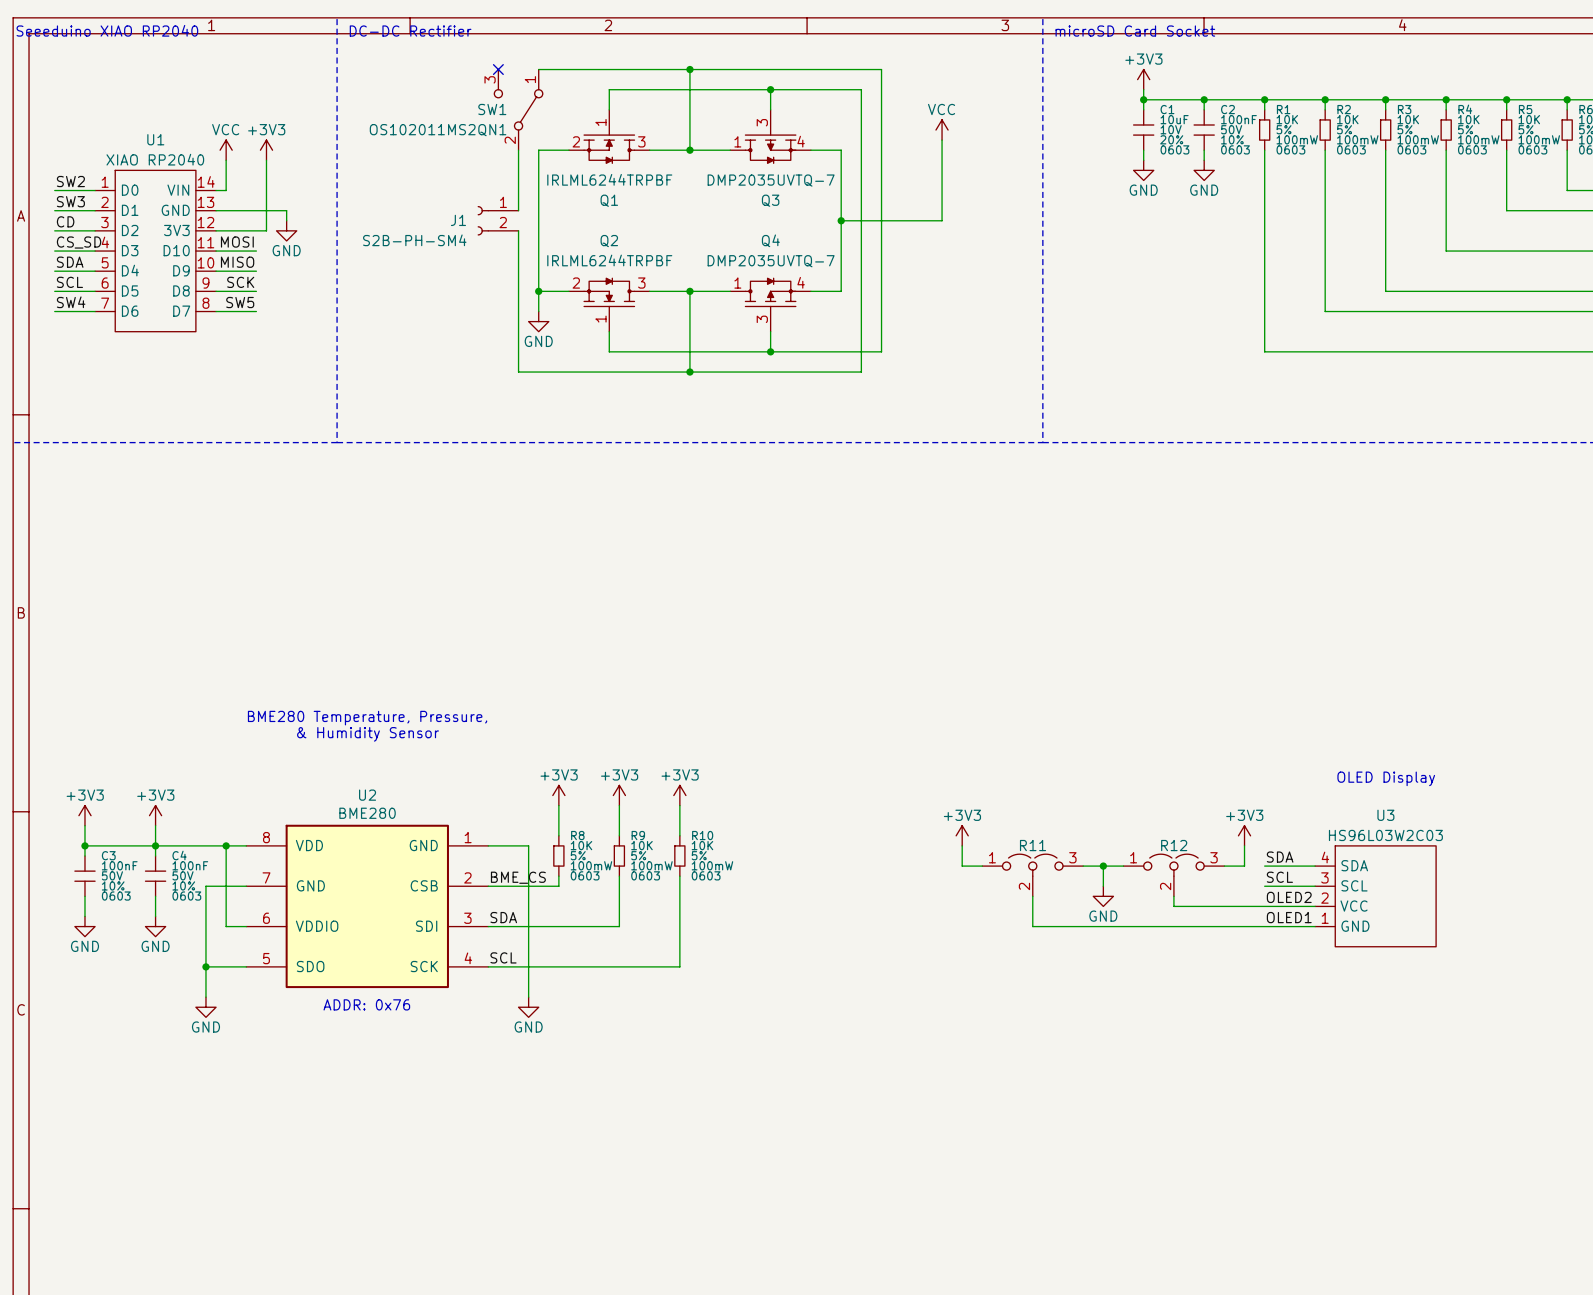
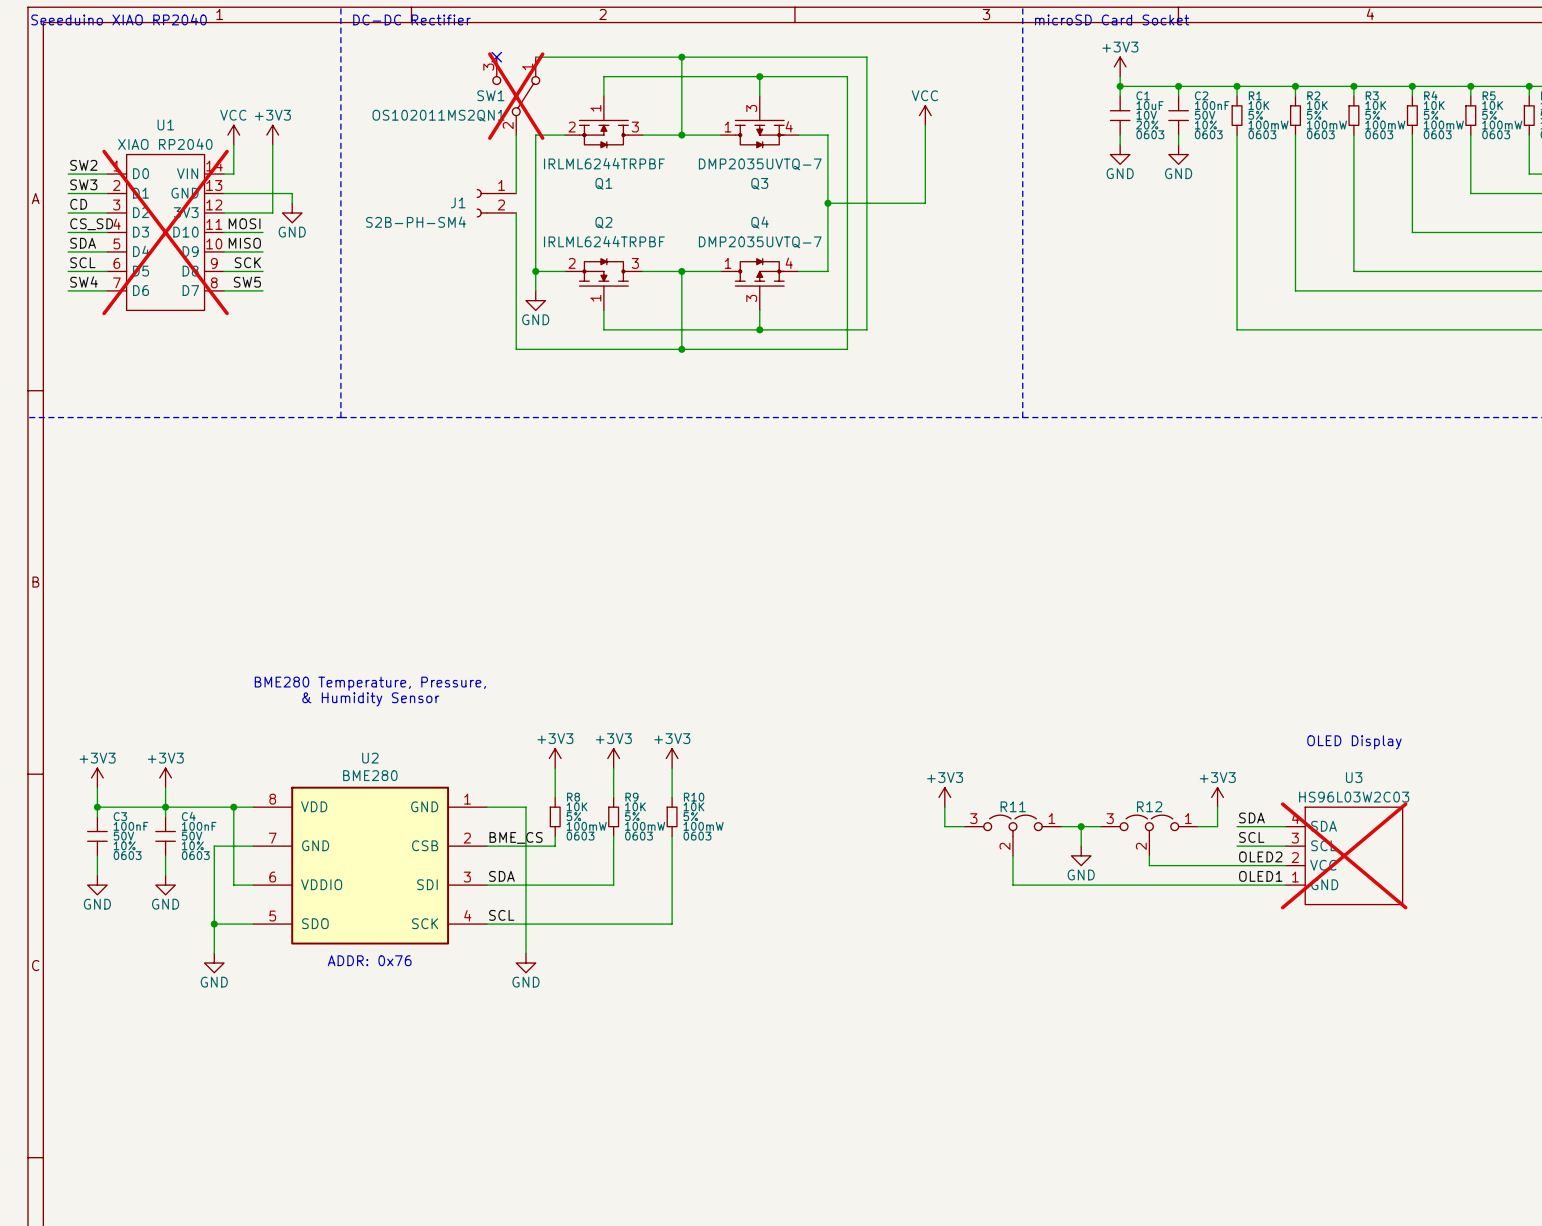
SW1 do-not-place cross: none -> (516, 96)
U1 do-not-place cross: none -> (165, 232)
R11 flip: as is (1032, 865) -> left-right (1013, 825)
R12 flip: as is (1173, 865) -> left-right (1149, 825)
U3 do-not-place cross: none -> (1344, 855)

